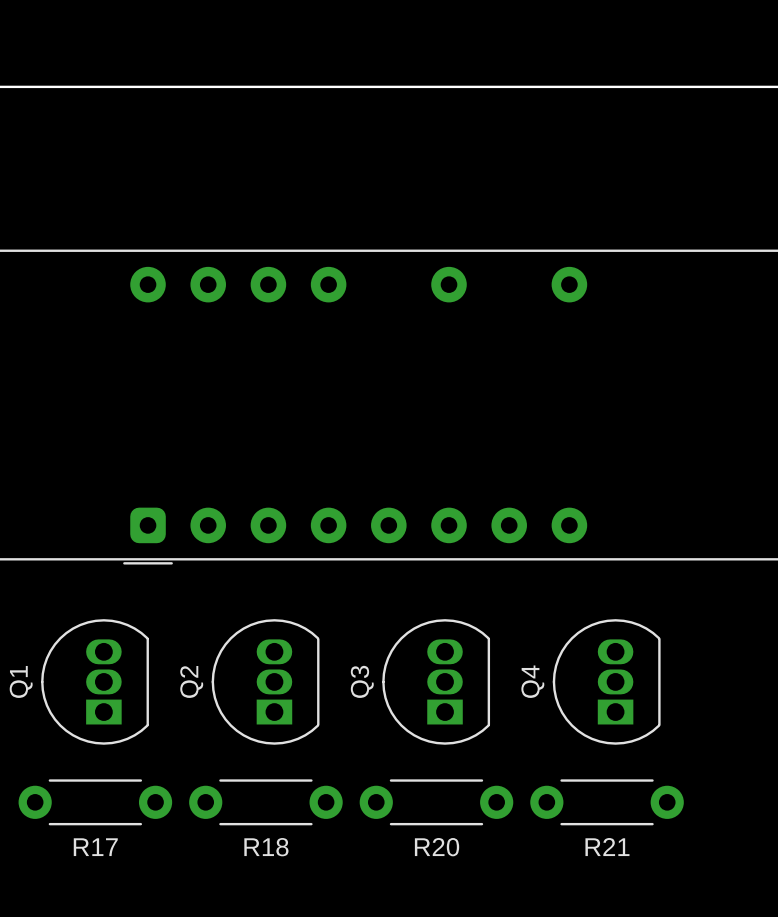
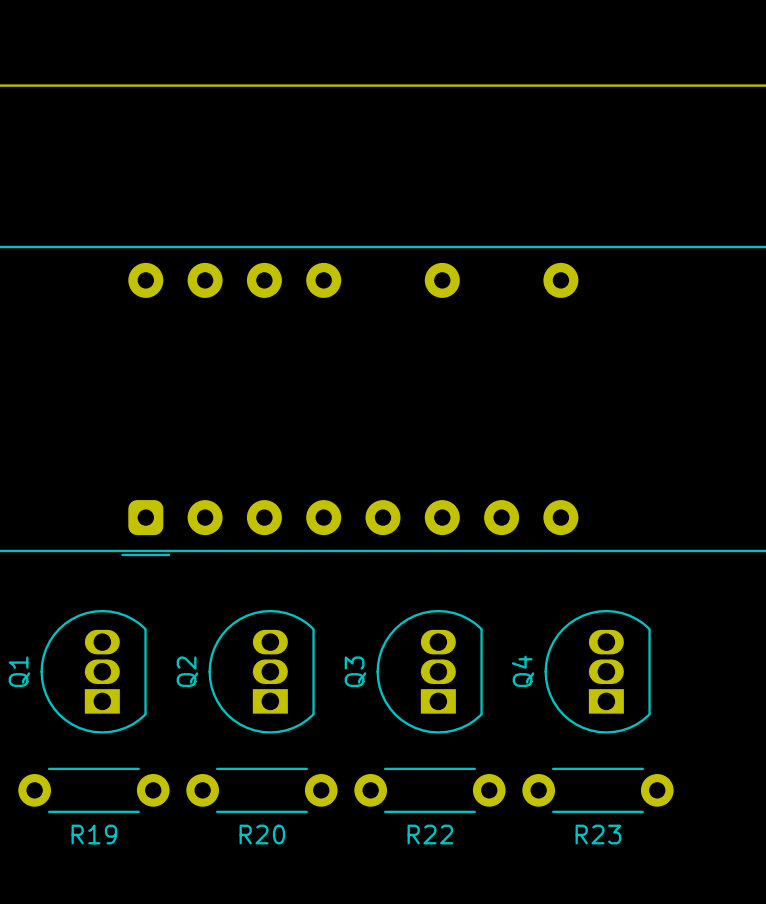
R17 name: R17 (95, 847) -> R19 (94, 834)
R18 name: R18 (266, 847) -> R20 (262, 834)
R20 name: R20 (437, 847) -> R22 (430, 834)
R21 name: R21 (607, 847) -> R23 (598, 834)

